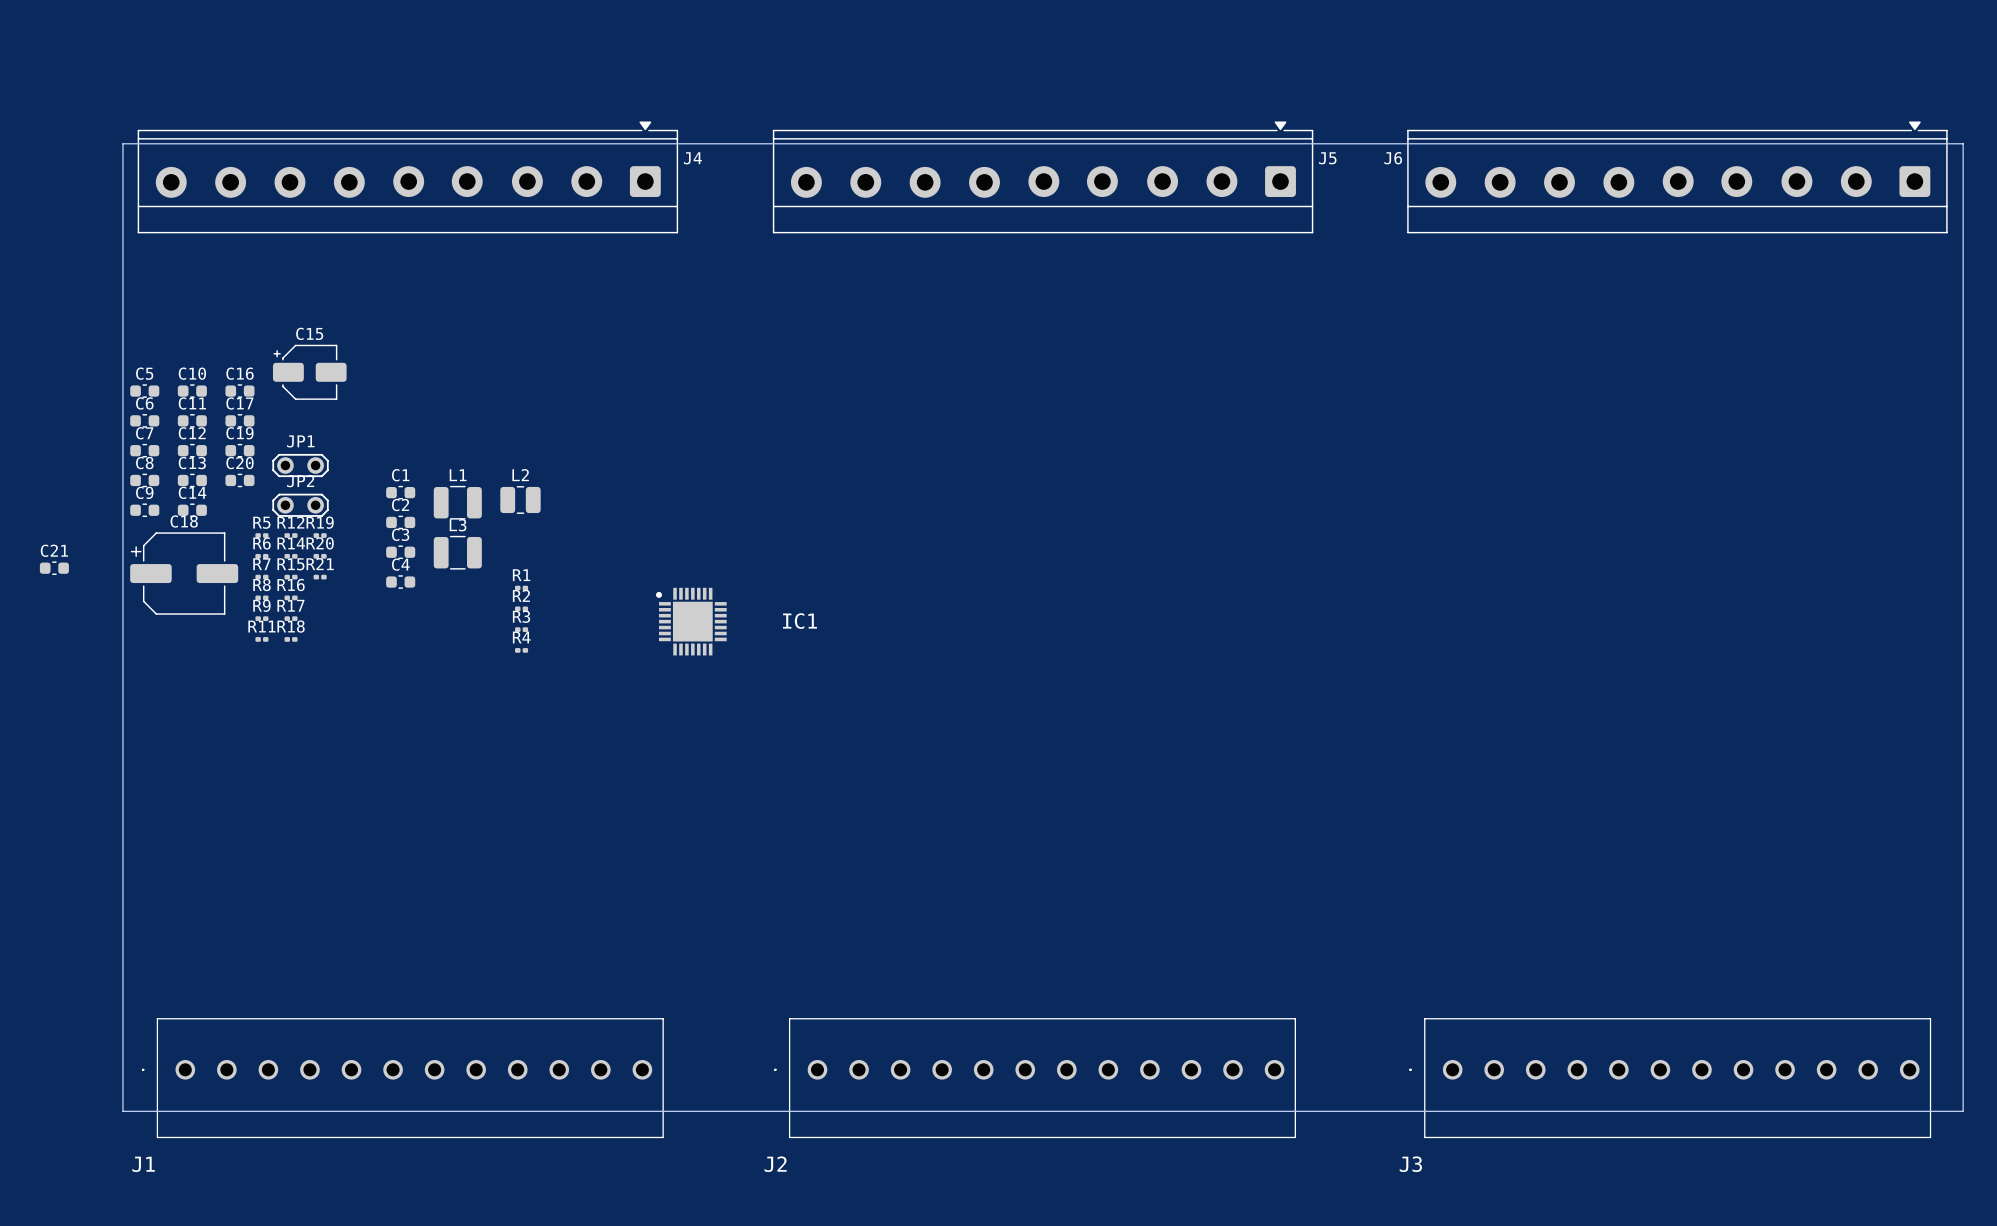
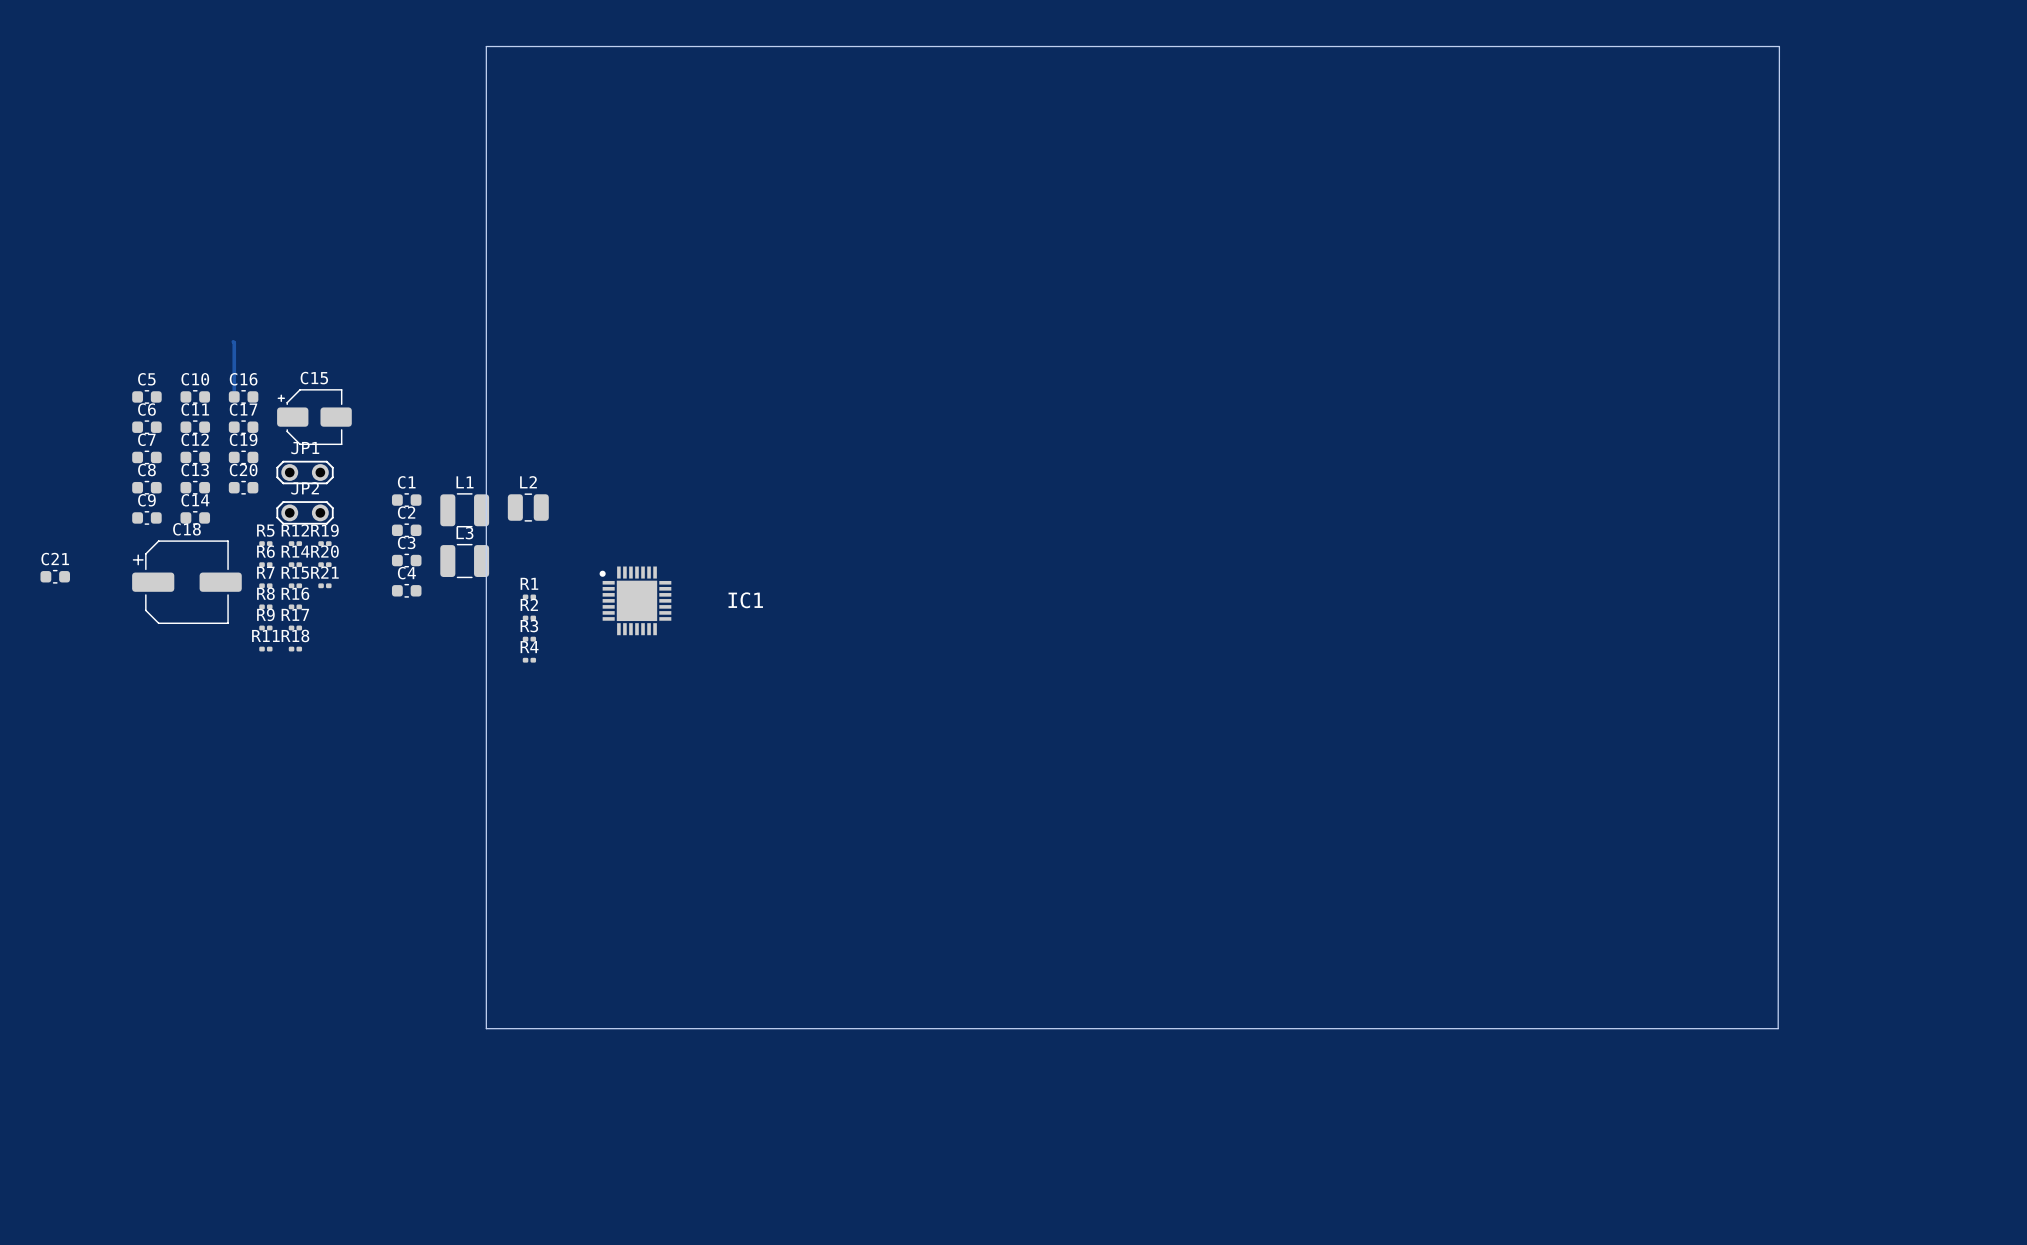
board edge: (122, 143) (1963, 143) (1963, 1111) (122, 1111) (122, 143) -> (486, 46) (486, 1028) (1778, 1028) (1779, 46) (486, 46)
J4: (407, 177) -> none
J5: (1043, 177) -> none
J6: (1677, 177) -> none
track: none -> (233, 341) (234, 396)
C15 position: (309, 372) -> (314, 417)
IC1 position: (691, 621) -> (635, 600)
J1: (402, 1078) -> none
J2: (1035, 1078) -> none
J3: (1670, 1078) -> none

